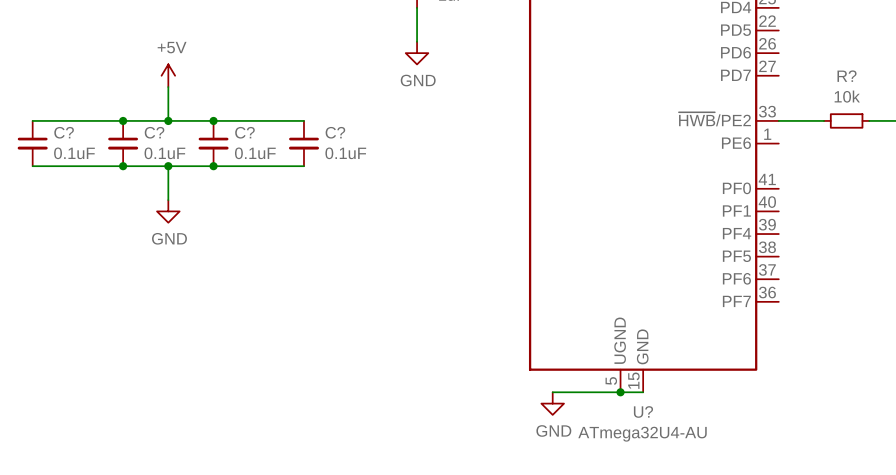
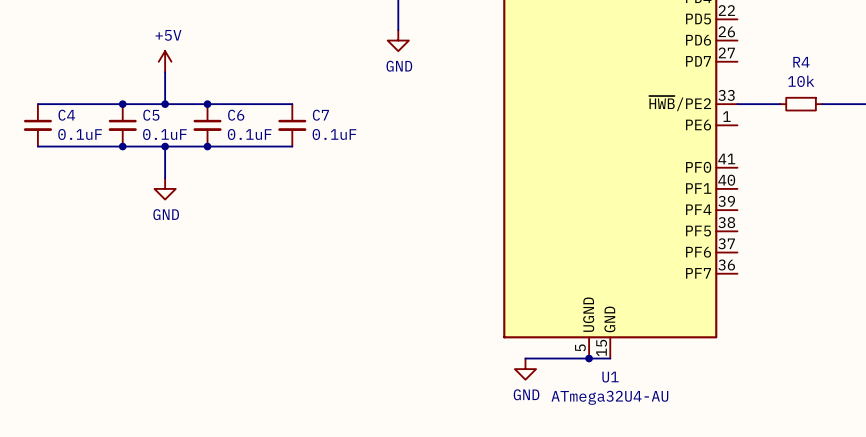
R? name: R? (847, 76) -> R4 (801, 62)
C? name: C? (64, 132) -> C4 (66, 115)
C? name: C? (154, 132) -> C5 (151, 115)
C? name: C? (244, 132) -> C6 (236, 115)
C? name: C? (335, 132) -> C7 (320, 115)
U? name: U? (643, 411) -> U1 (610, 377)

